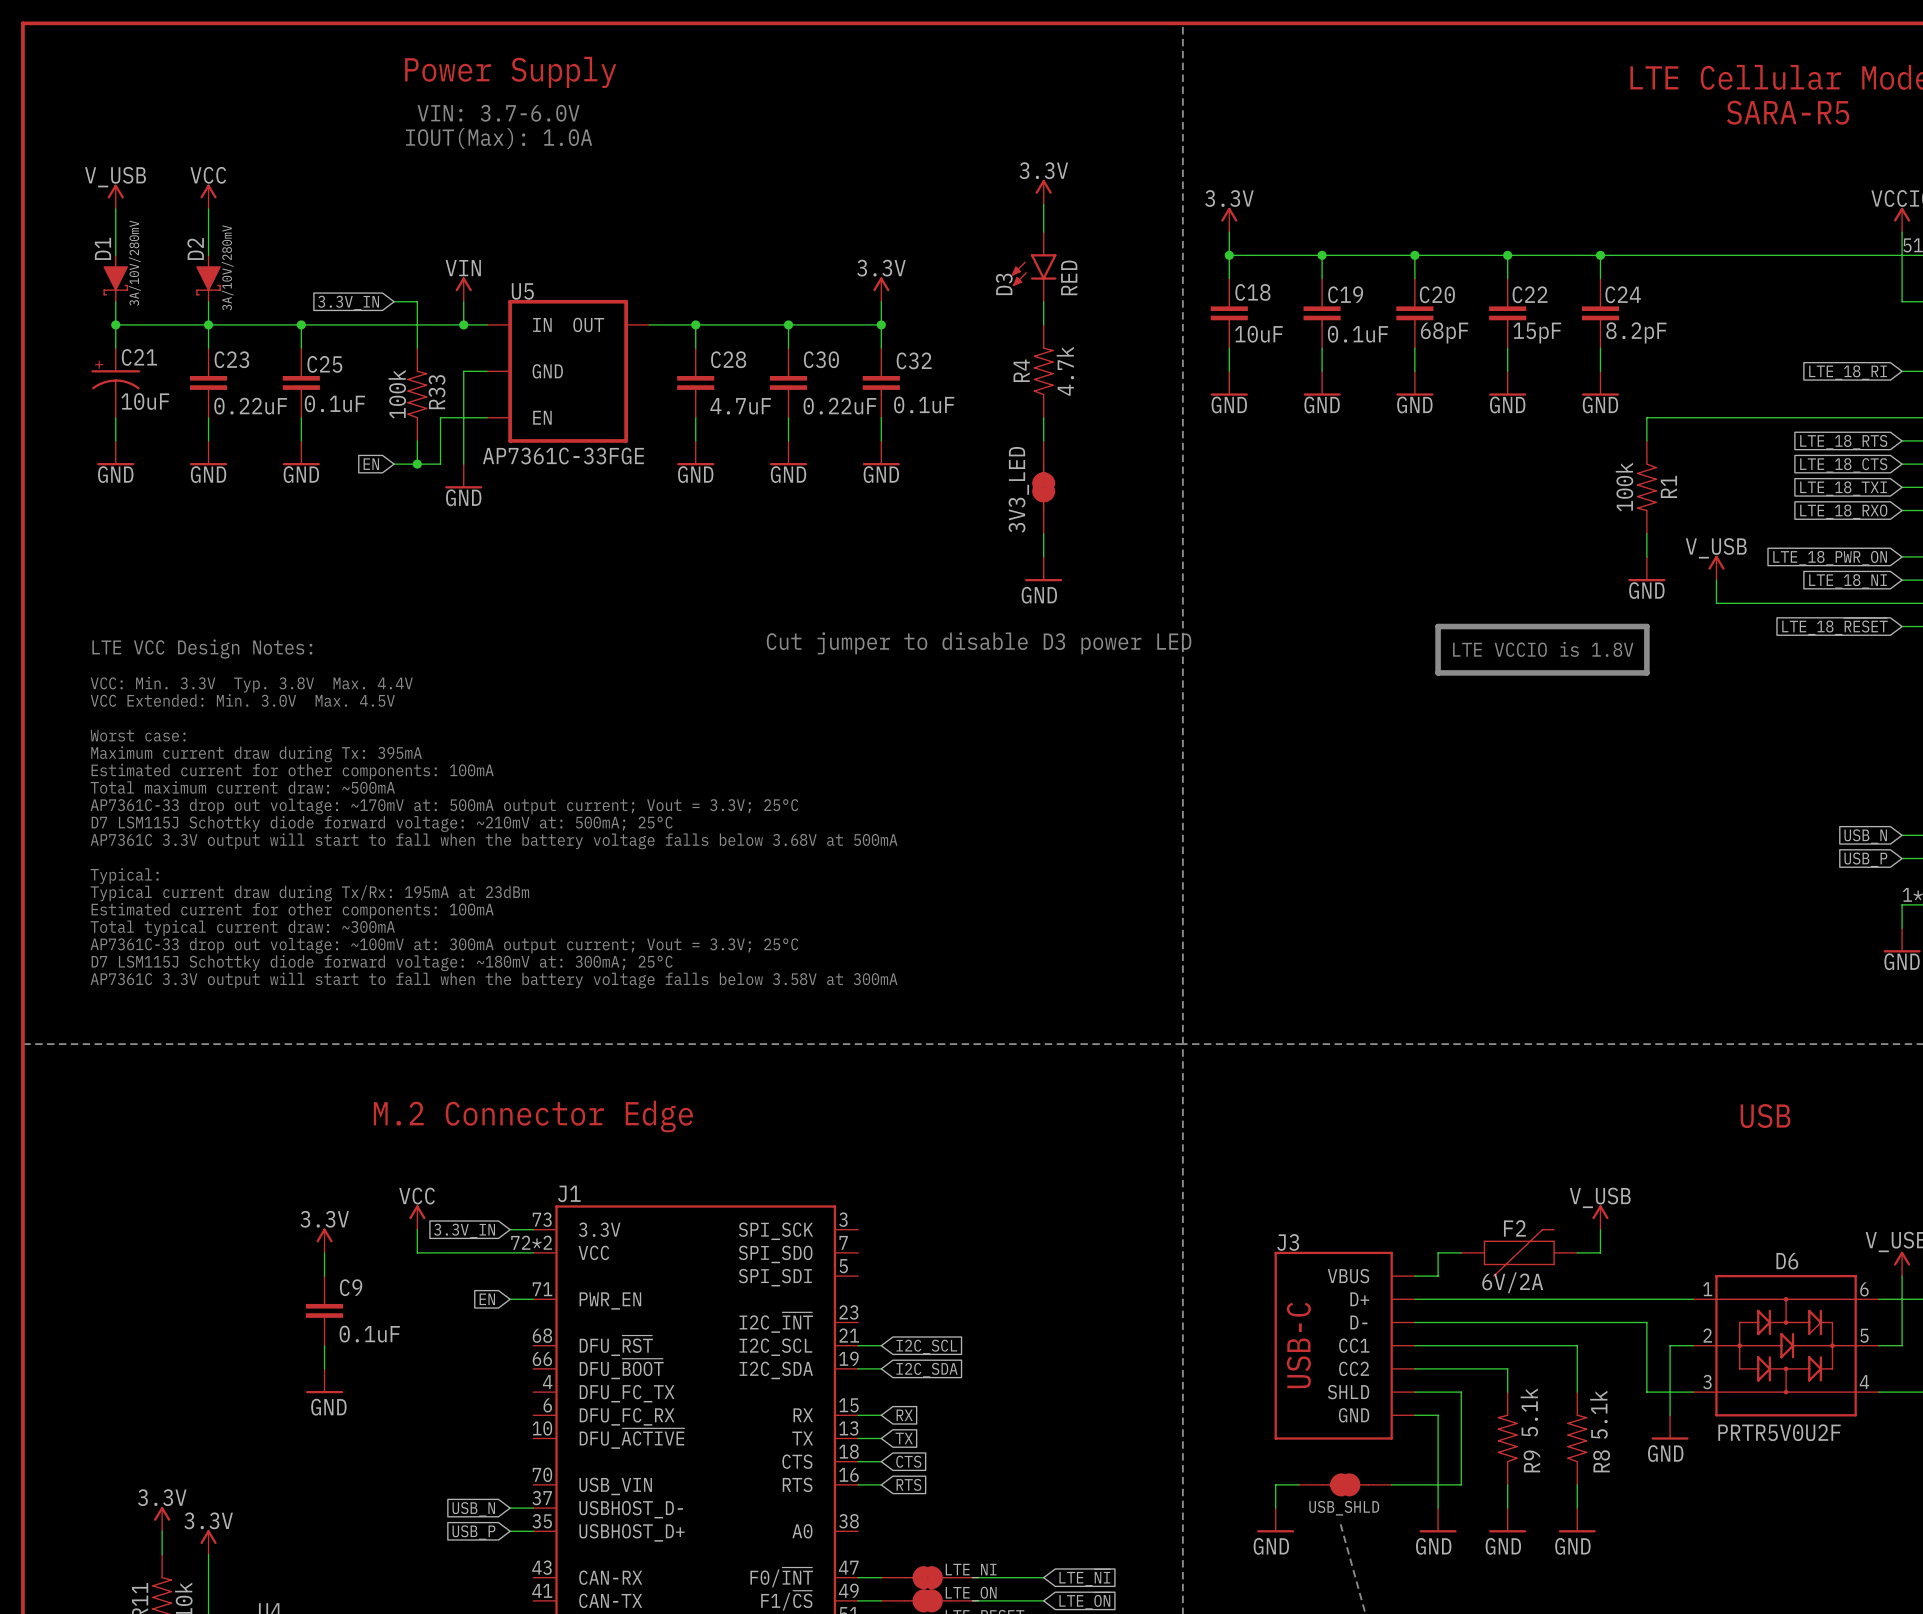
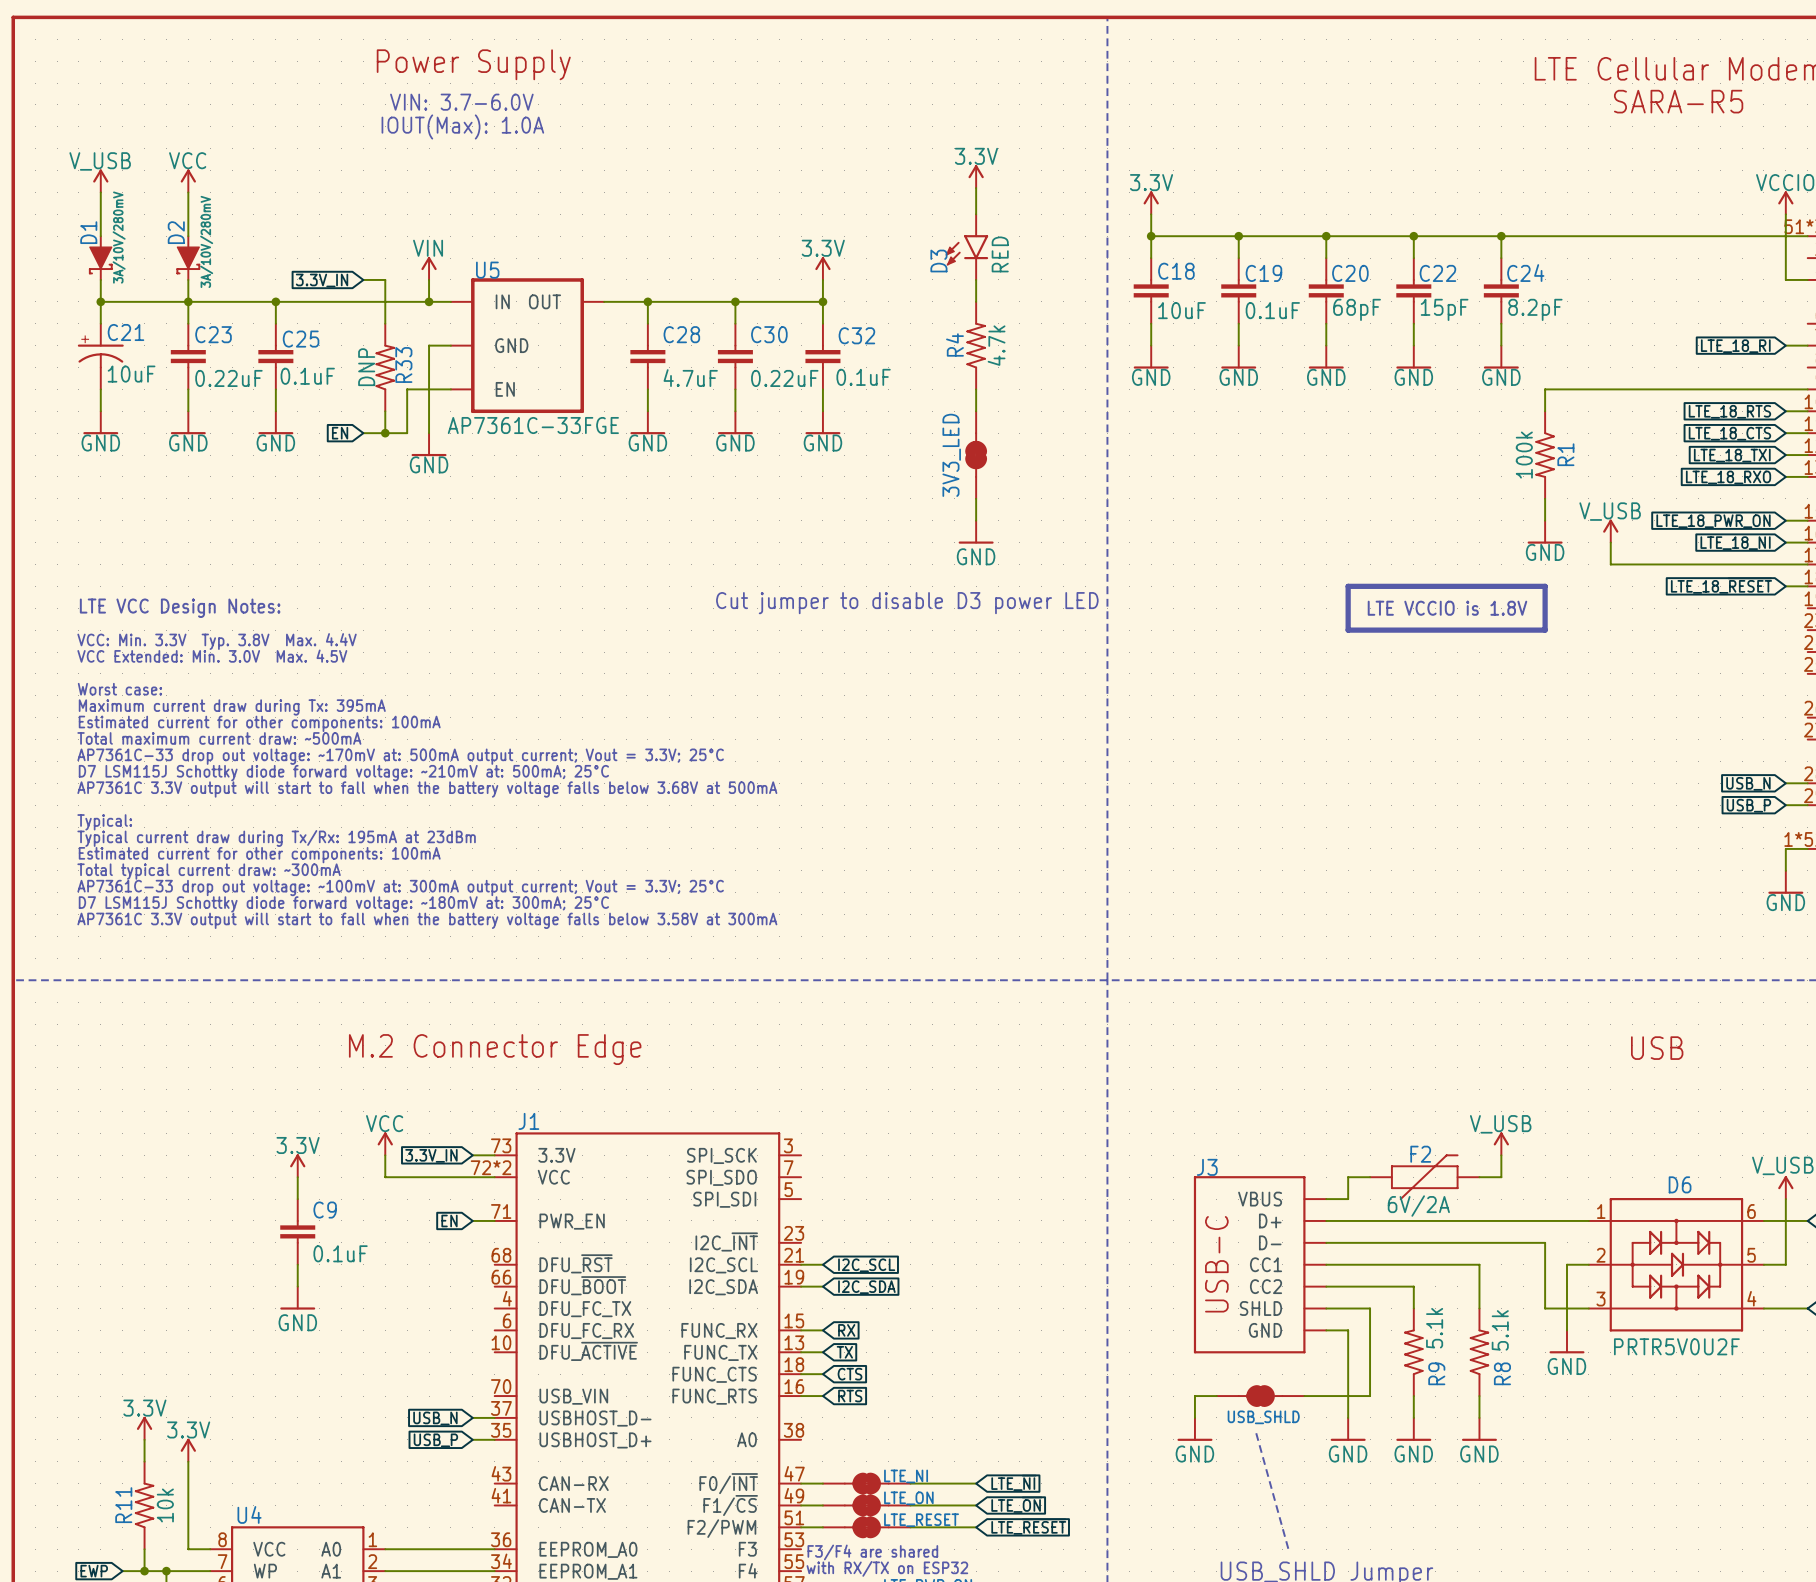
R33 value: 100k (397, 394) -> DNP (366, 367)
J1 pin name: RX (803, 1415) -> FUNC_RX (719, 1331)
J1 pin name: TX (802, 1438) -> FUNC_TX (720, 1352)
J1 pin name: CTS (797, 1461) -> FUNC_CTS (714, 1374)
J1 pin name: RTS (797, 1484) -> FUNC_RTS (714, 1396)

